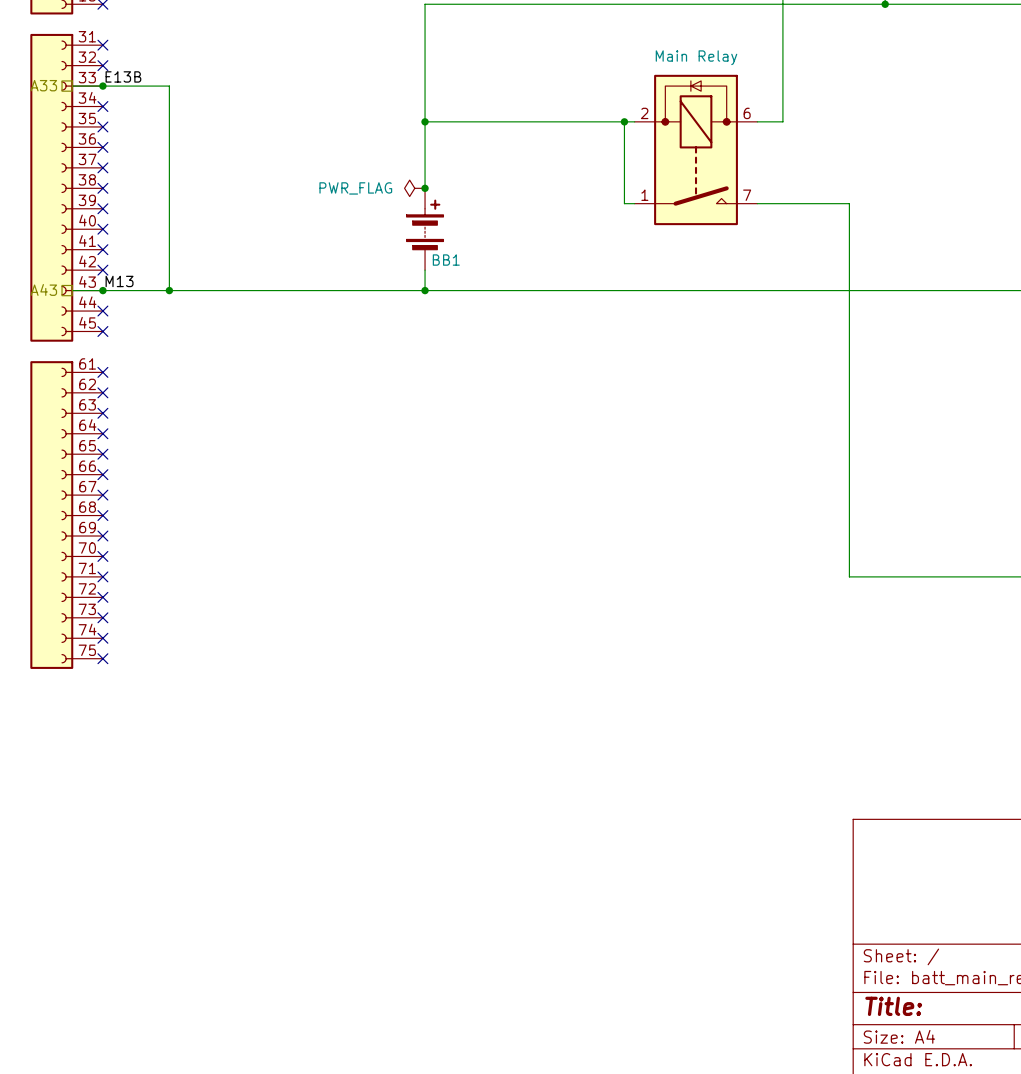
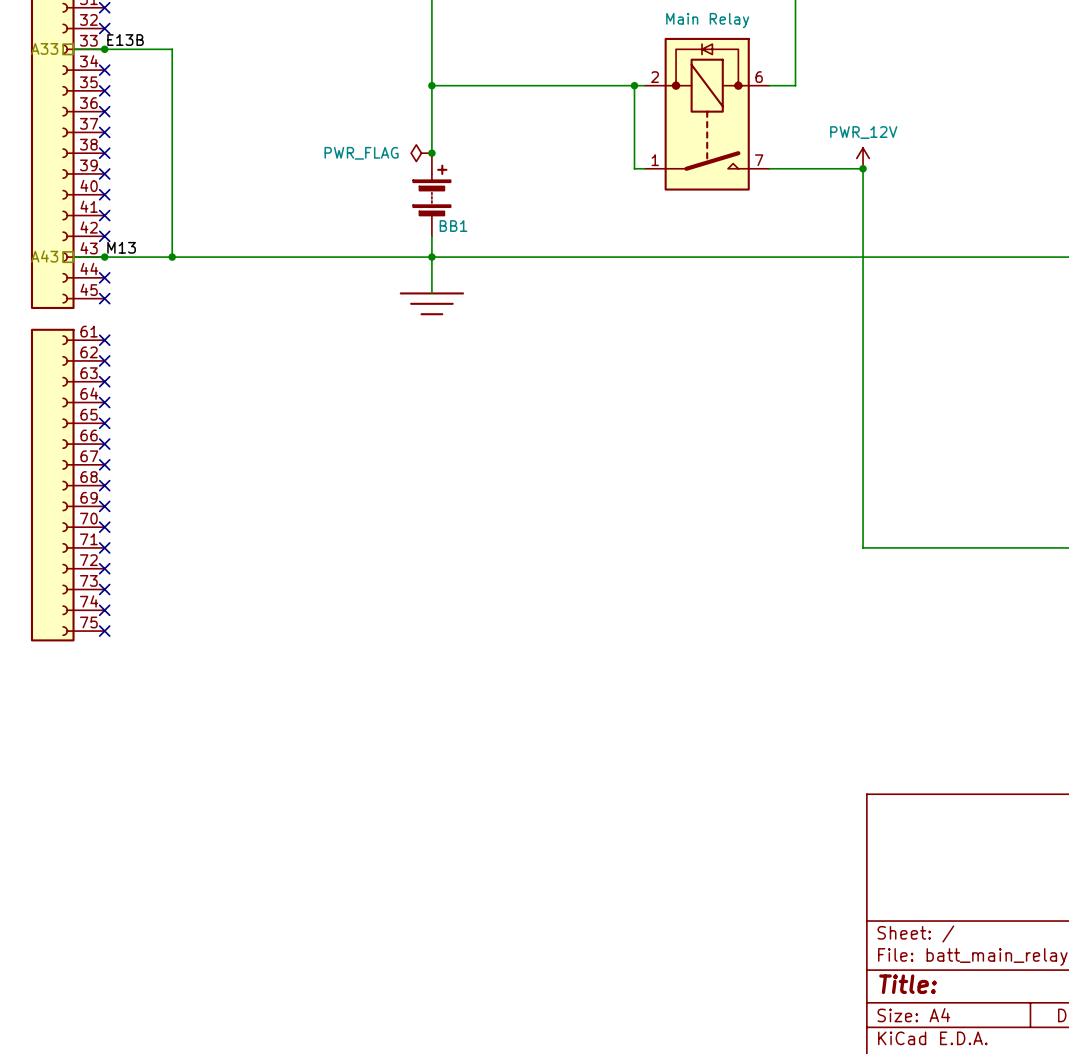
power symbol: none -> PWR_12V (863, 158)
junction: none -> (863, 168)
wire: none -> (431, 257) (431, 293)
power symbol: none -> (431, 303)

